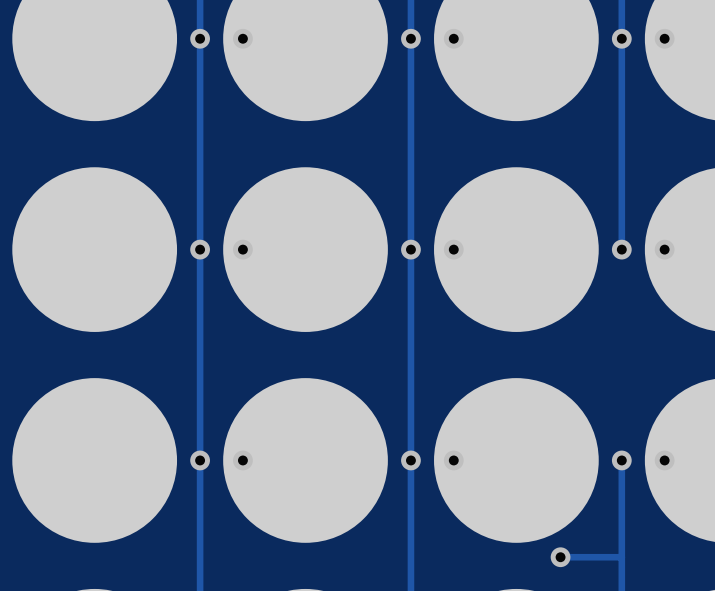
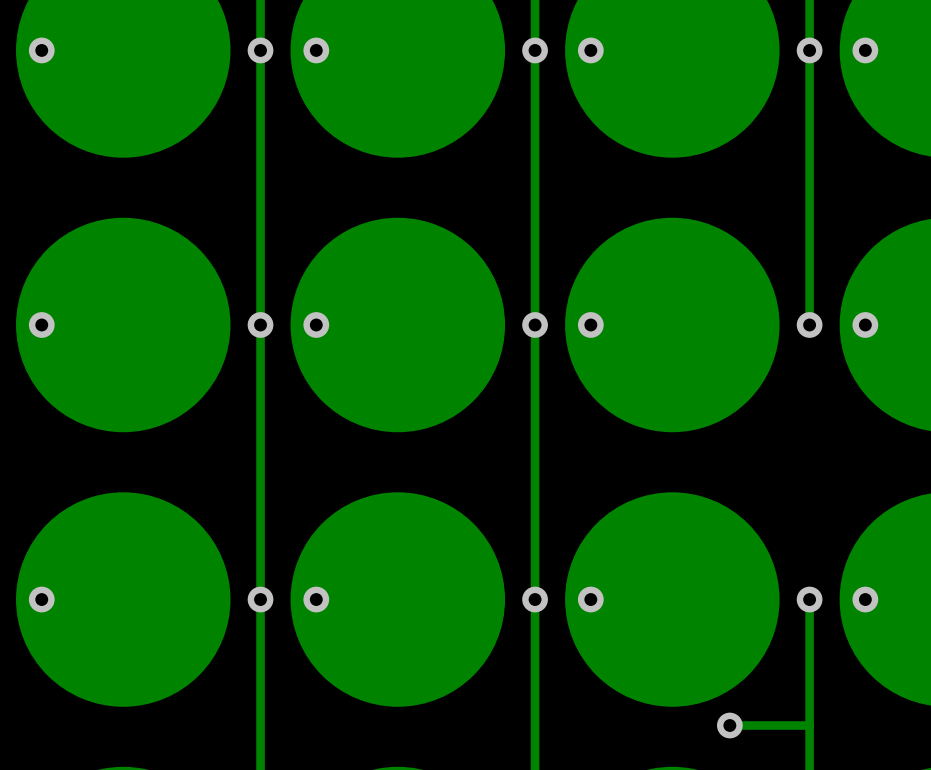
via: none -> (41, 50)
via: none -> (41, 324)
via: none -> (41, 599)

